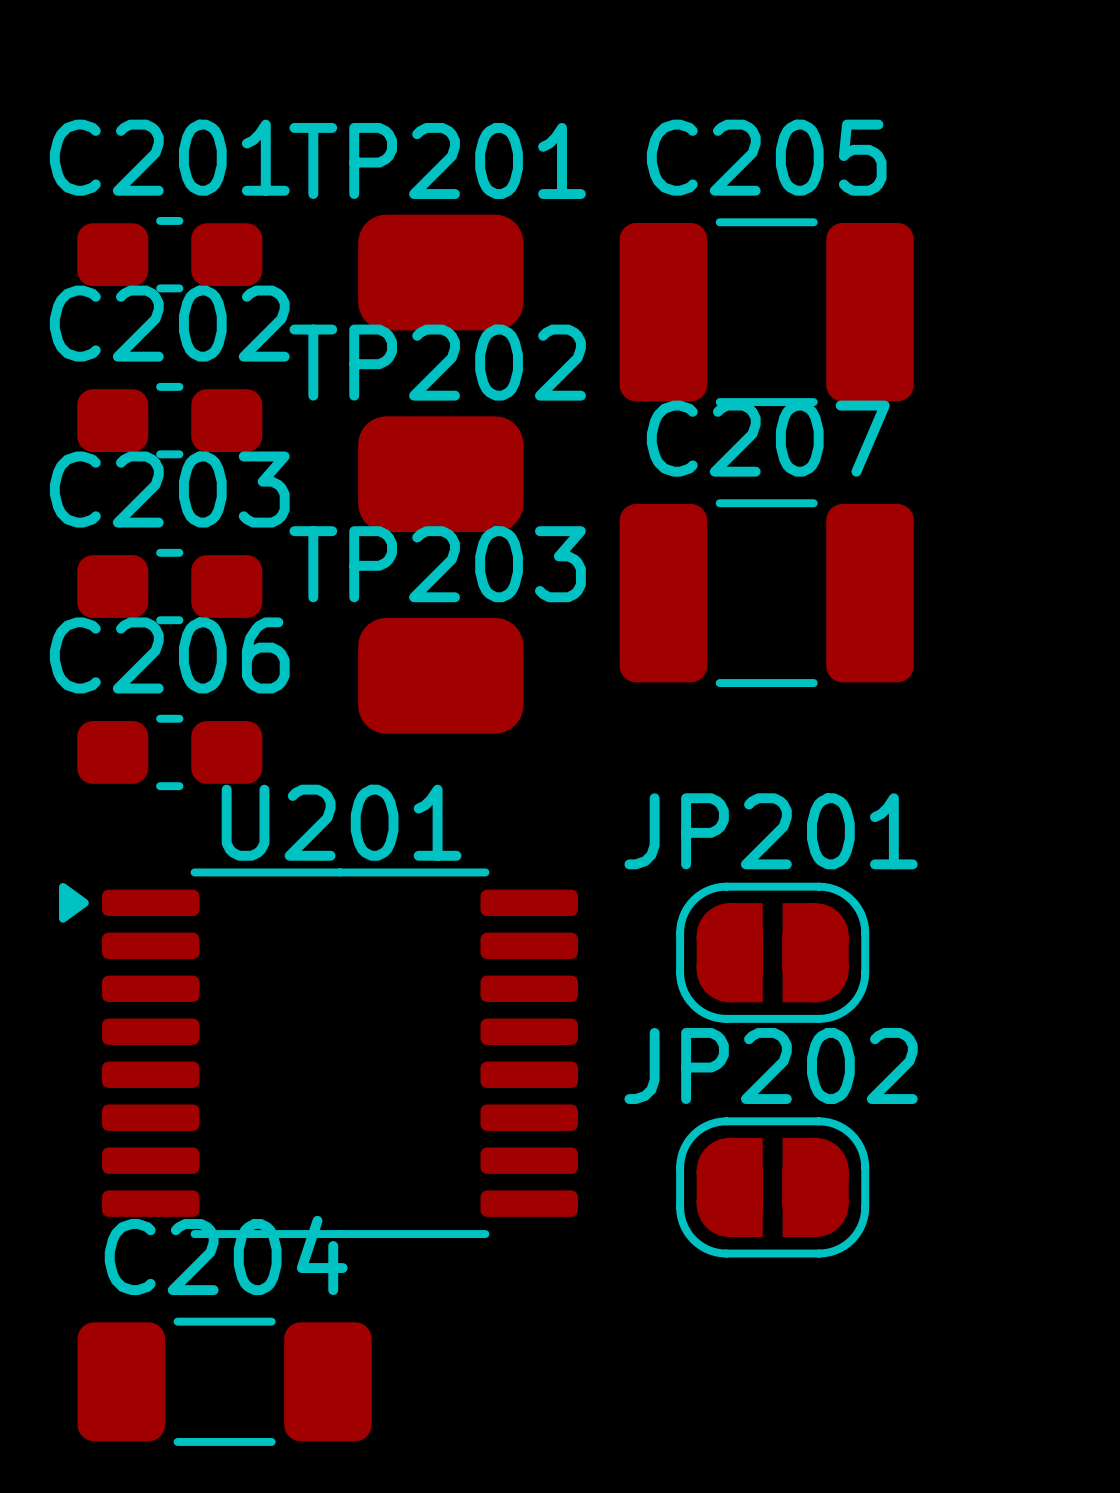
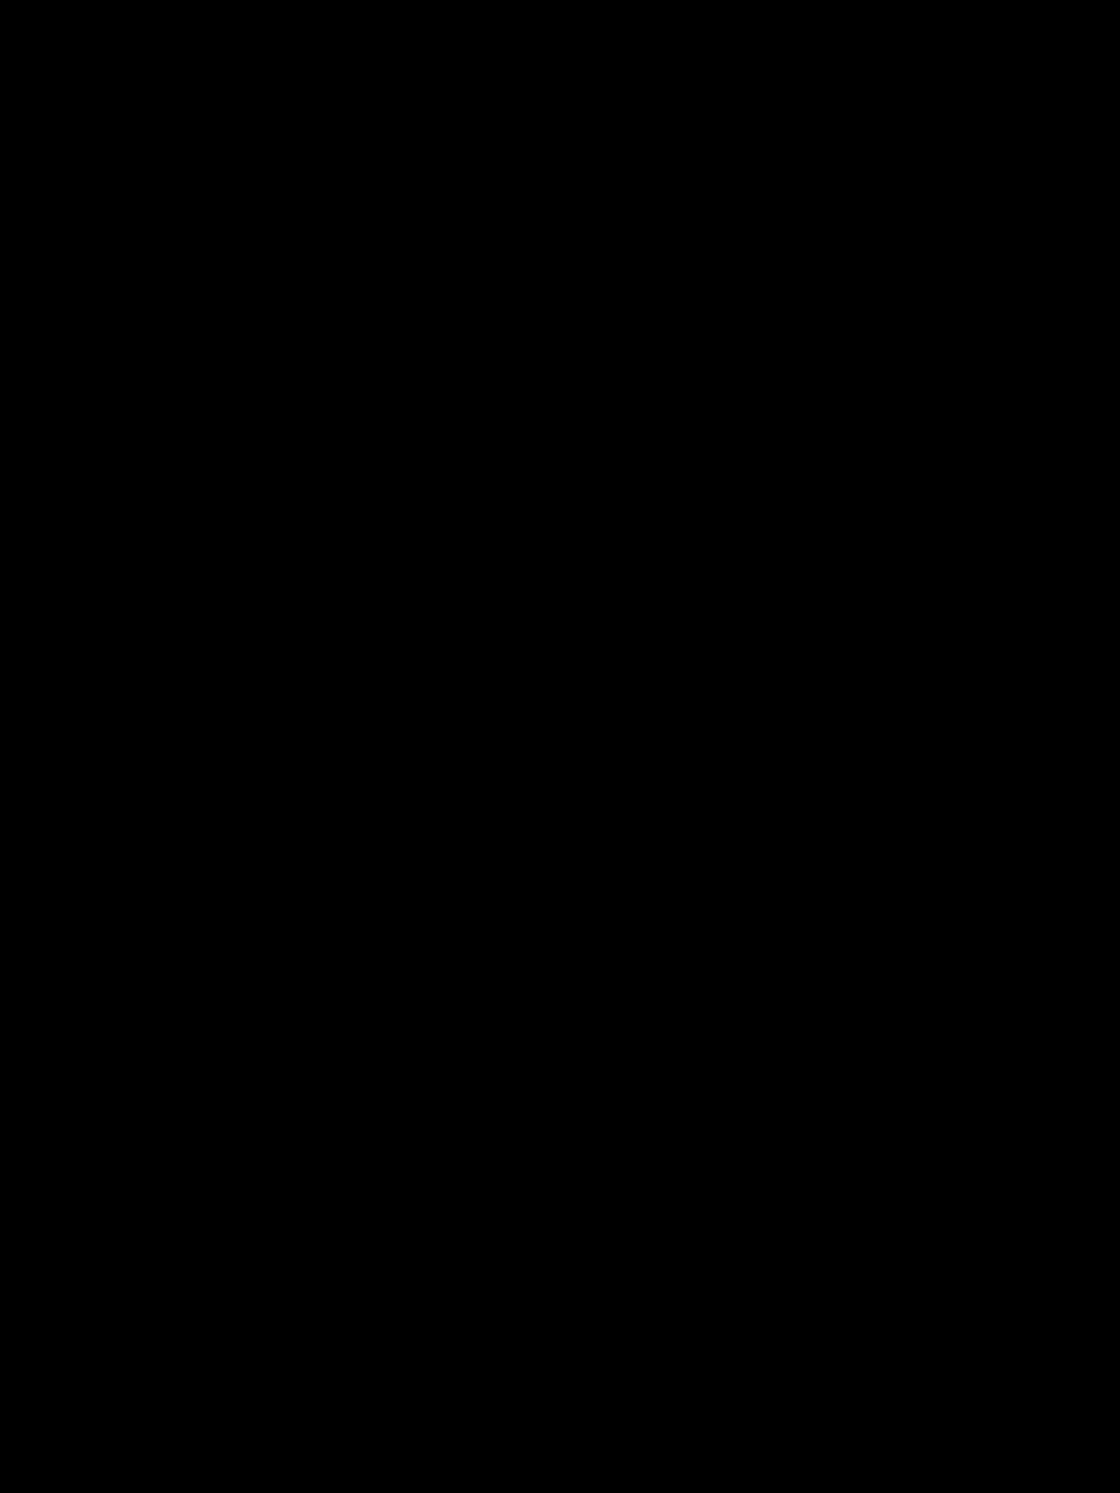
C201: (169, 254) -> none
TP201: (440, 272) -> none
C205: (766, 312) -> none
C202: (169, 420) -> none
TP202: (440, 474) -> none
C203: (169, 586) -> none
C207: (766, 593) -> none
TP203: (440, 675) -> none
C206: (169, 752) -> none
JP201: (772, 952) -> none
U201: (318, 1053) -> none
JP202: (772, 1187) -> none
C204: (224, 1381) -> none

